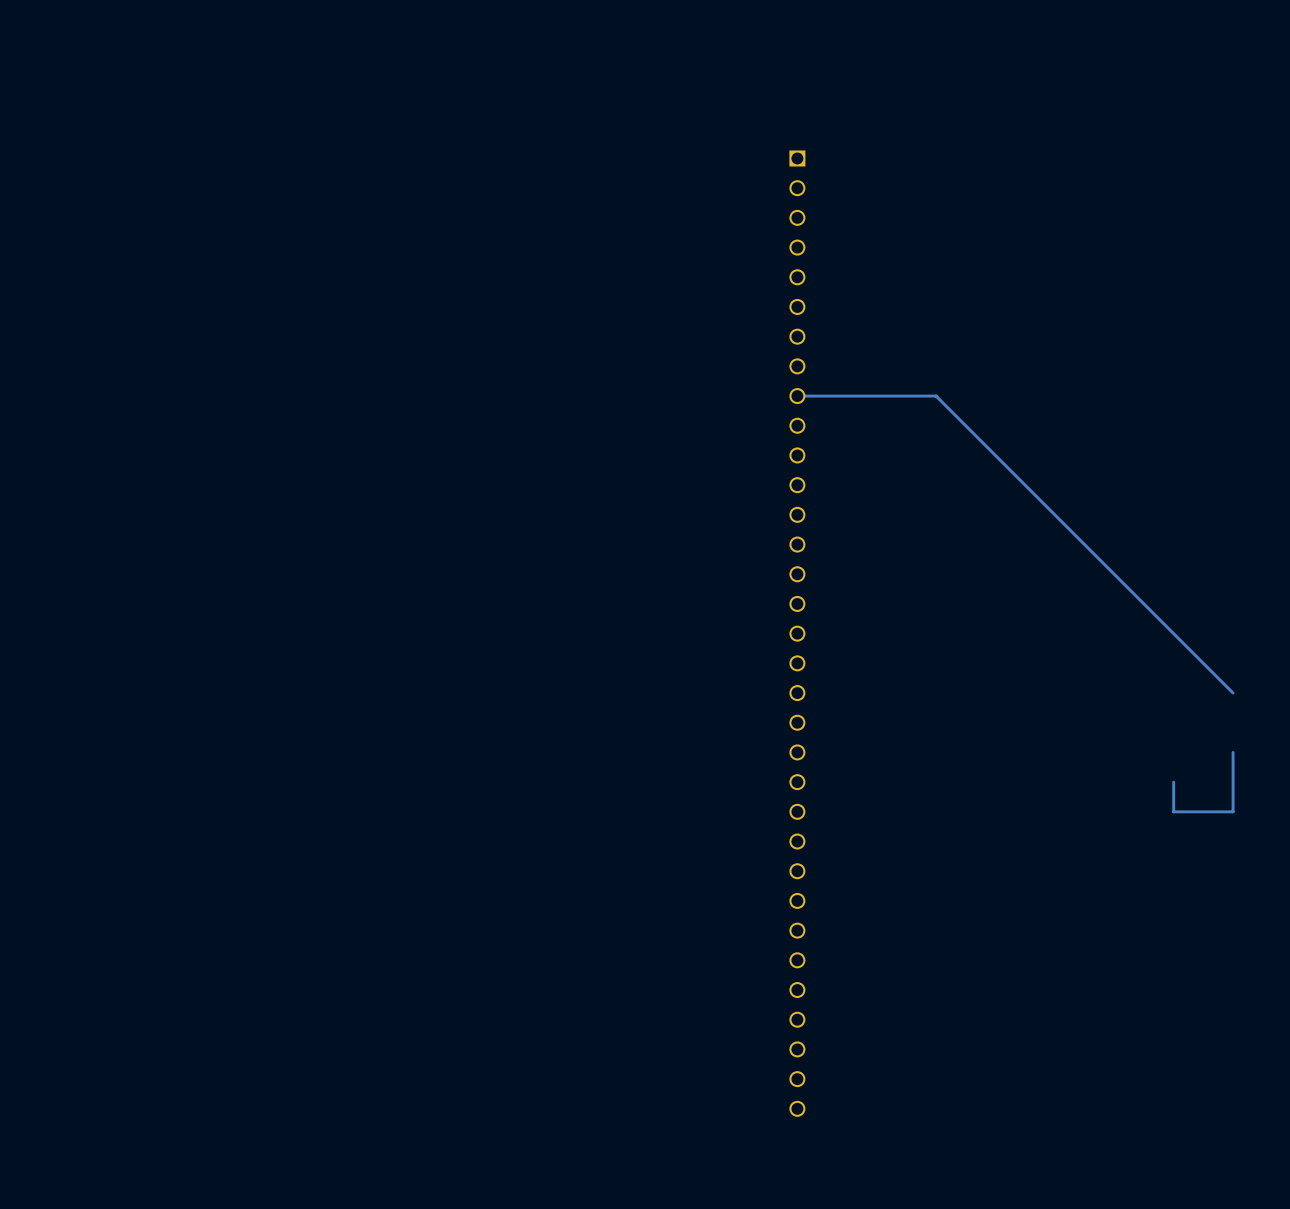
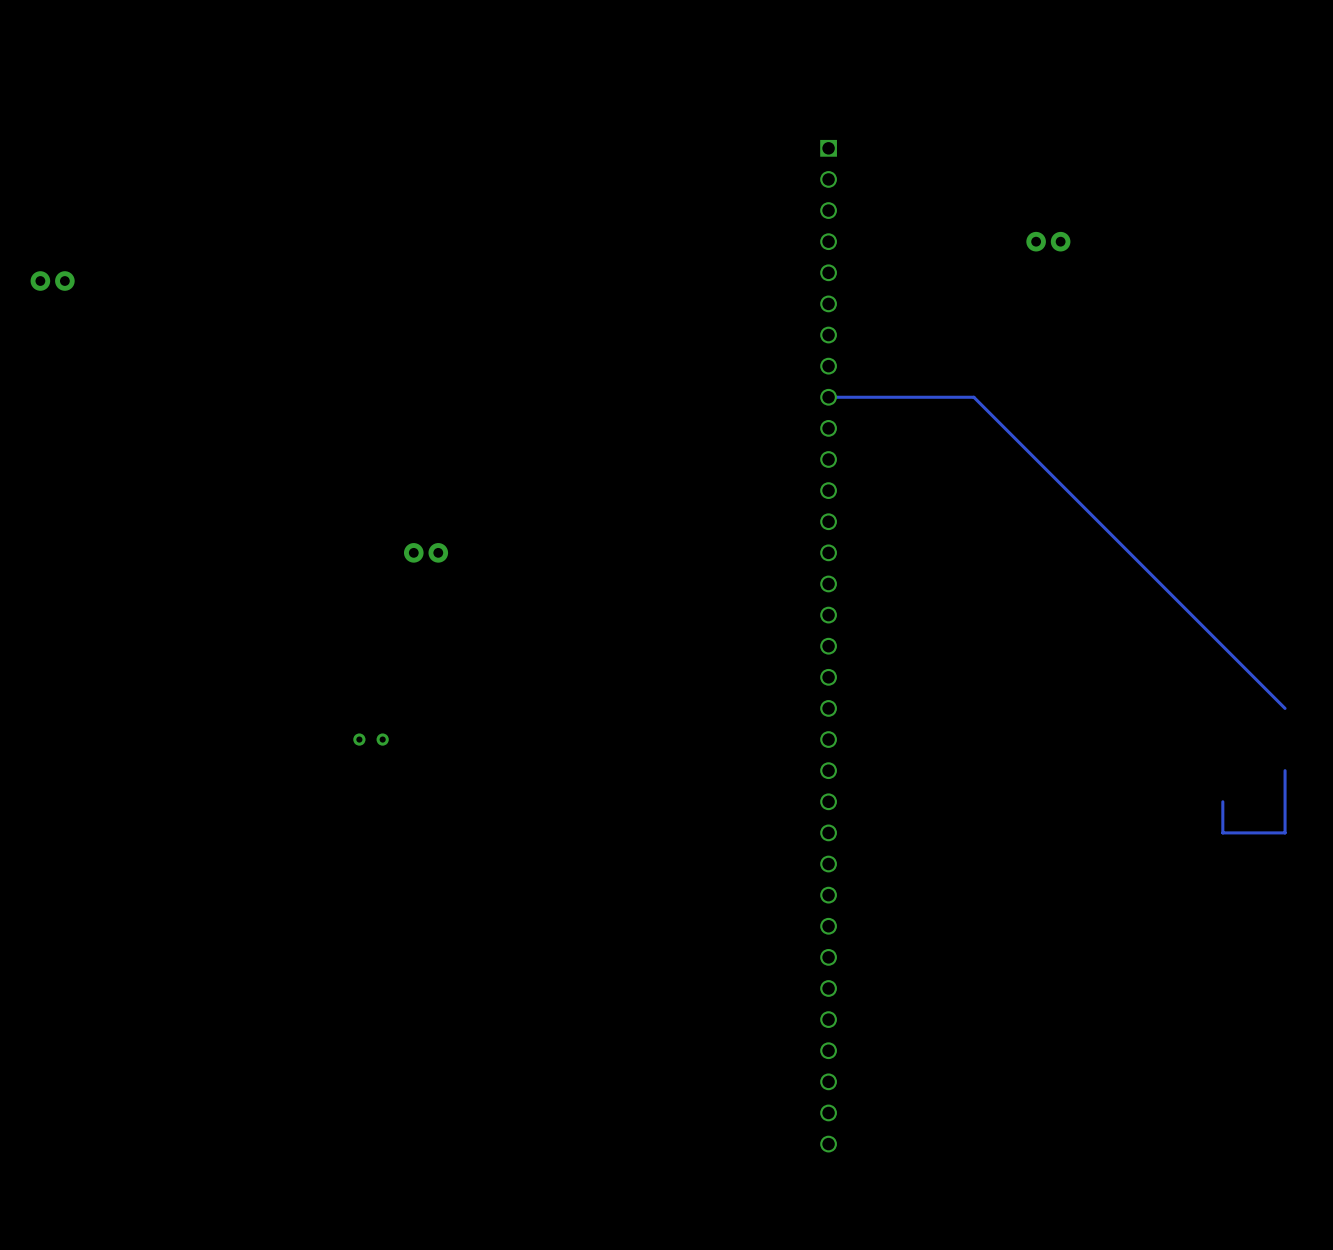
part: none -> (1048, 241)
part: none -> (52, 281)
part: none -> (426, 552)
part: none -> (371, 739)

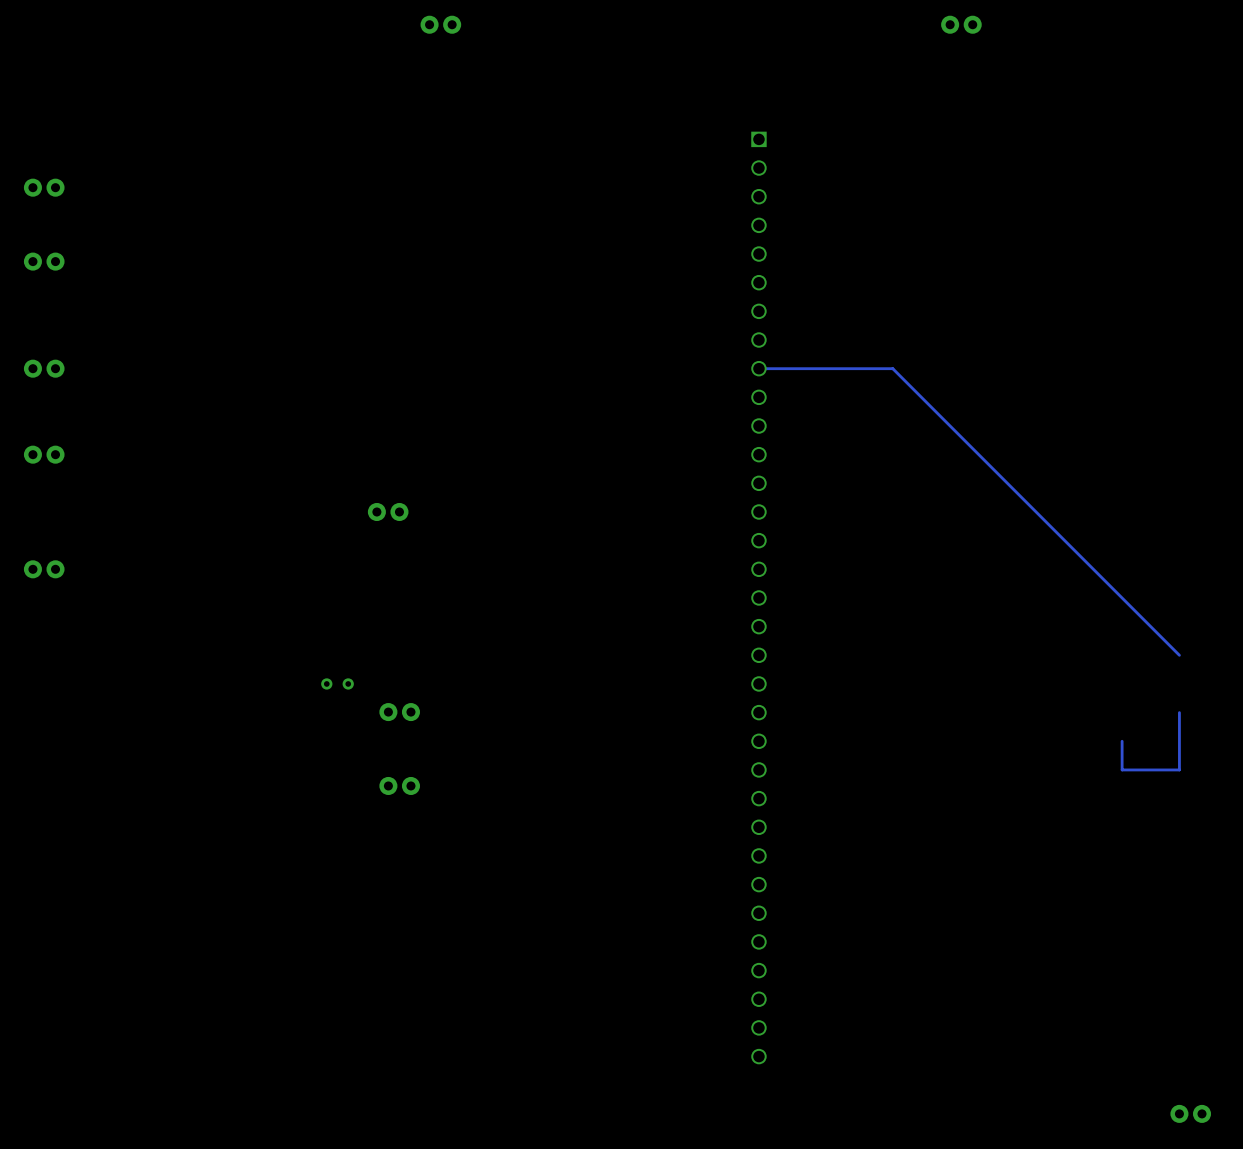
part: none -> (440, 24)
part: none -> (44, 187)
part position: (1048, 241) -> (961, 24)
part: none -> (44, 368)
part: none -> (44, 454)
part: none -> (44, 569)
part: none -> (399, 712)
part: none -> (399, 785)
part: none -> (1190, 1113)

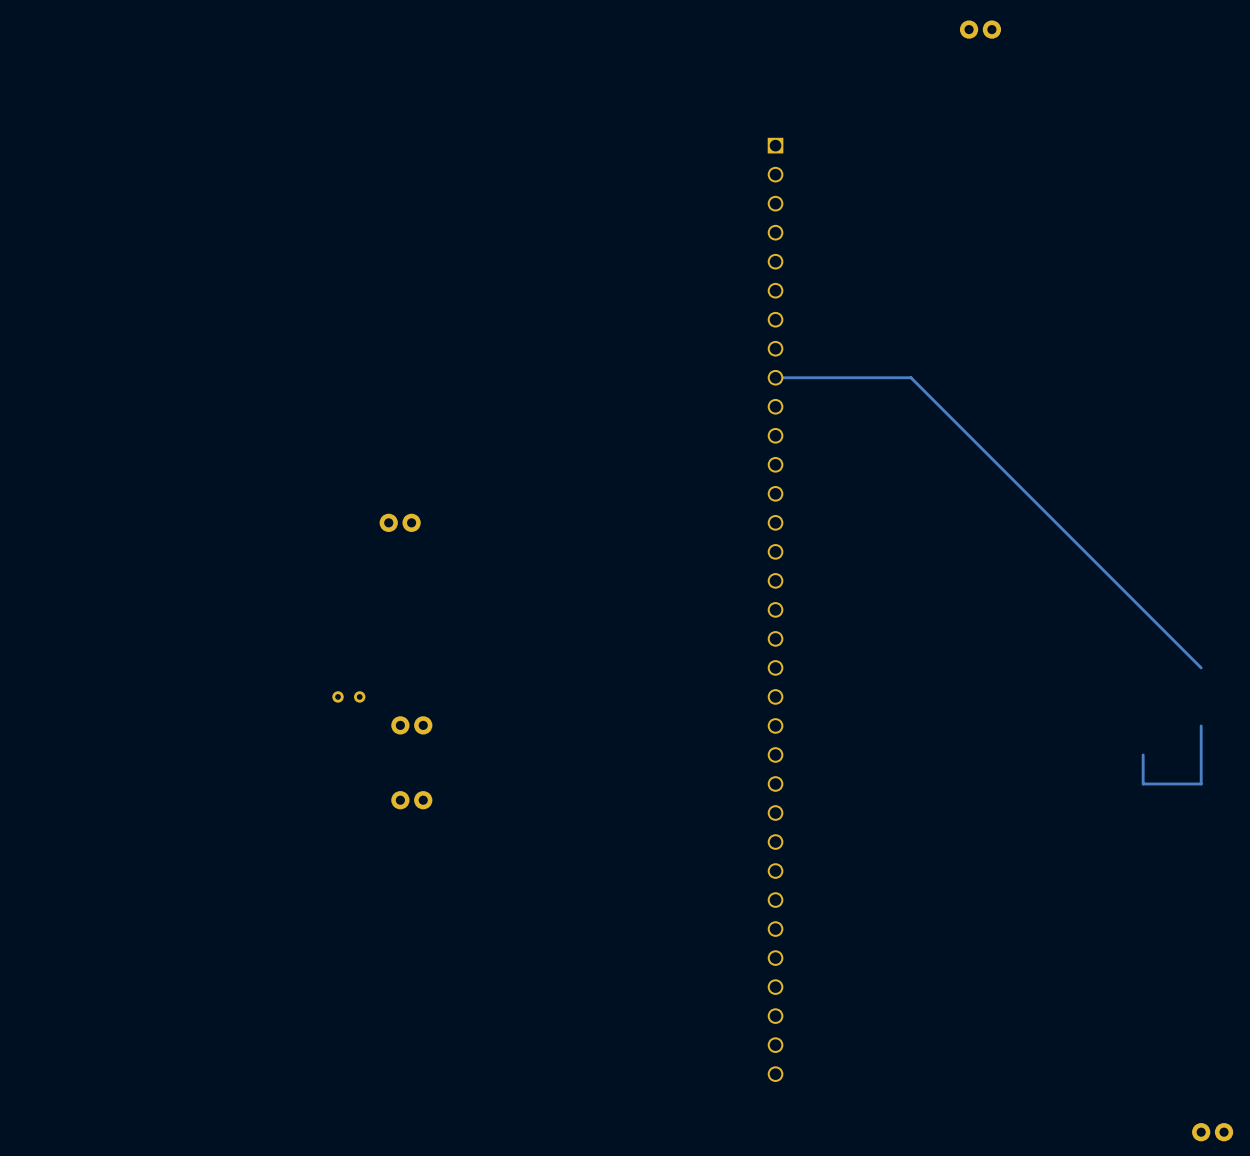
part: (440, 24) -> none
part: (44, 187) -> none
part: (44, 261) -> none
part: (44, 368) -> none
part: (44, 454) -> none
part: (44, 569) -> none

